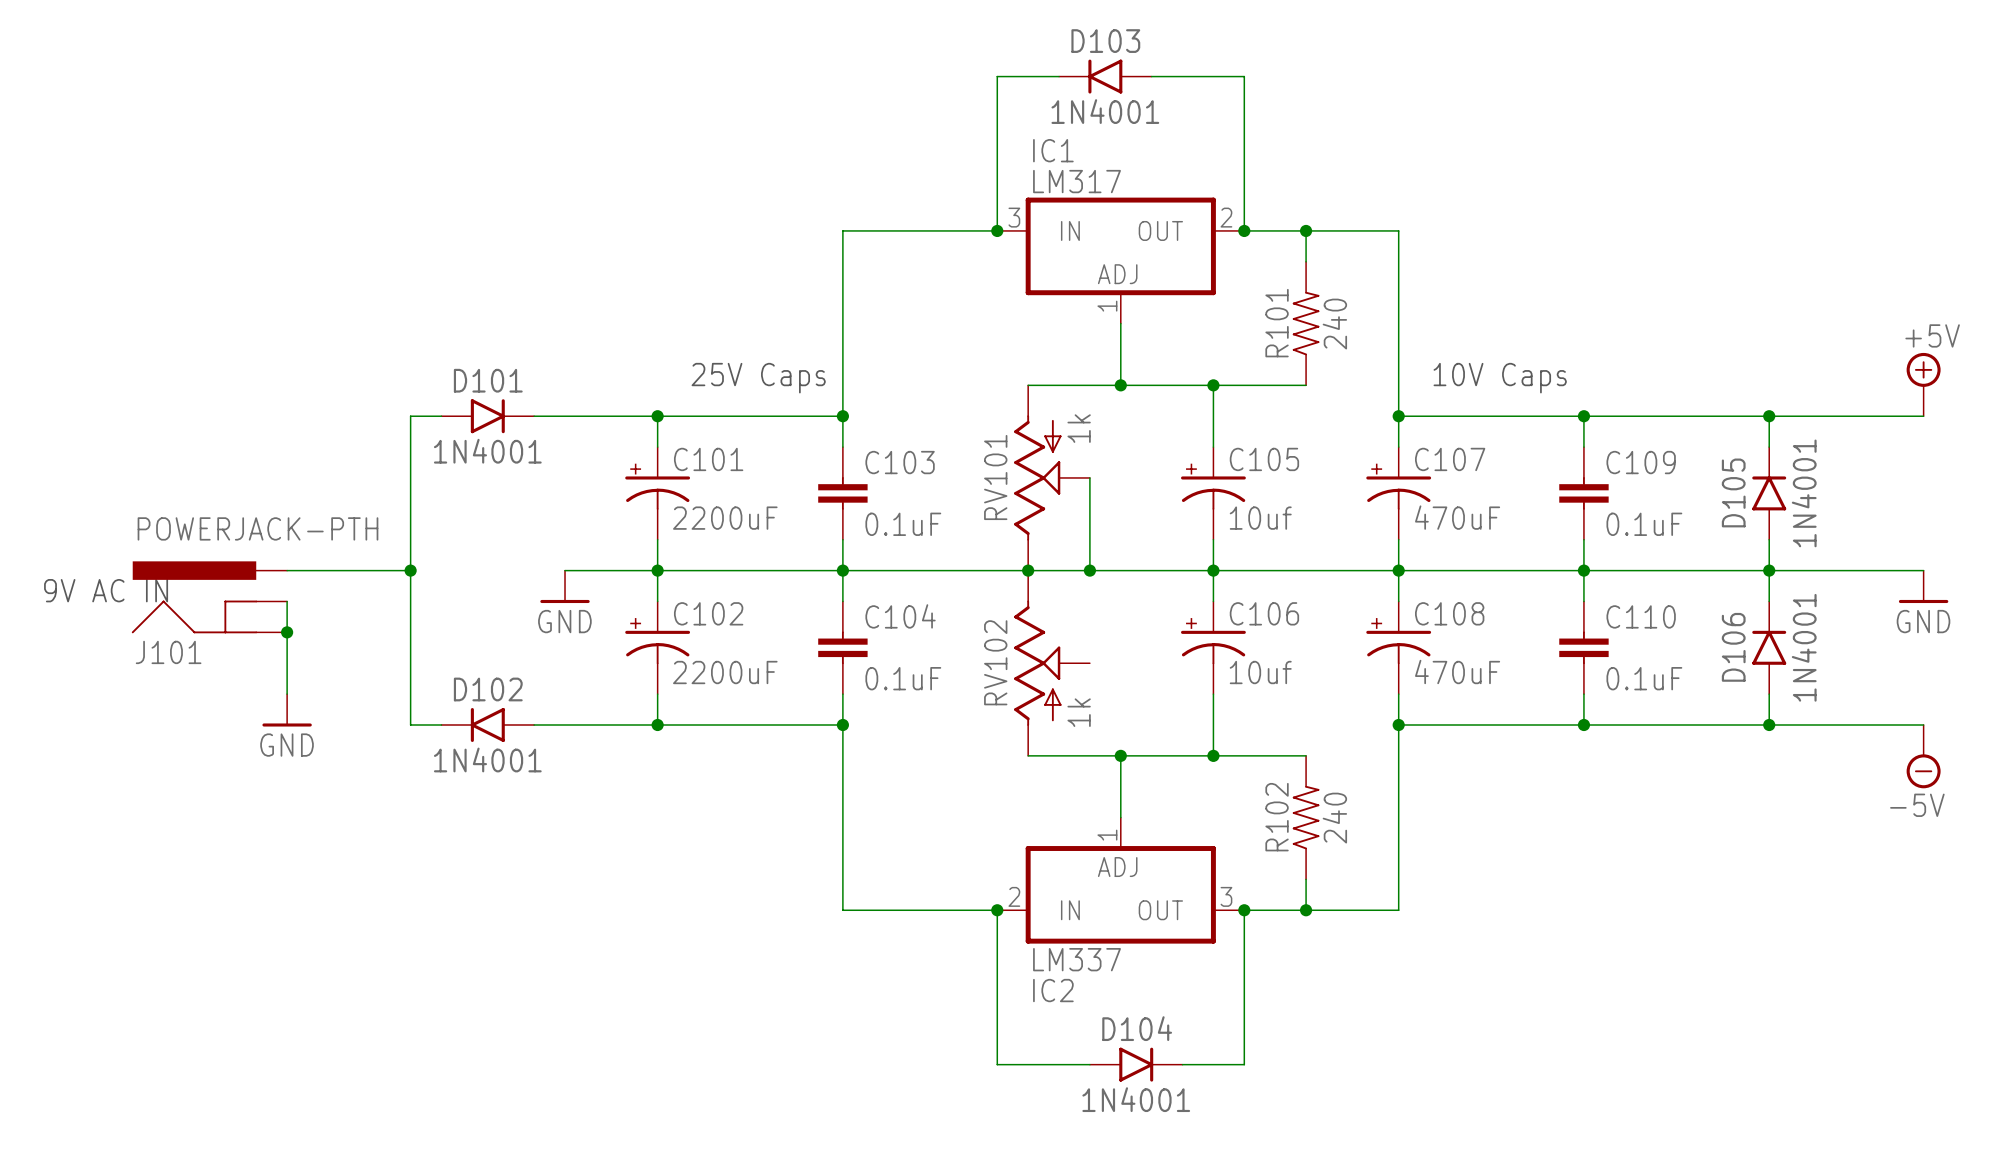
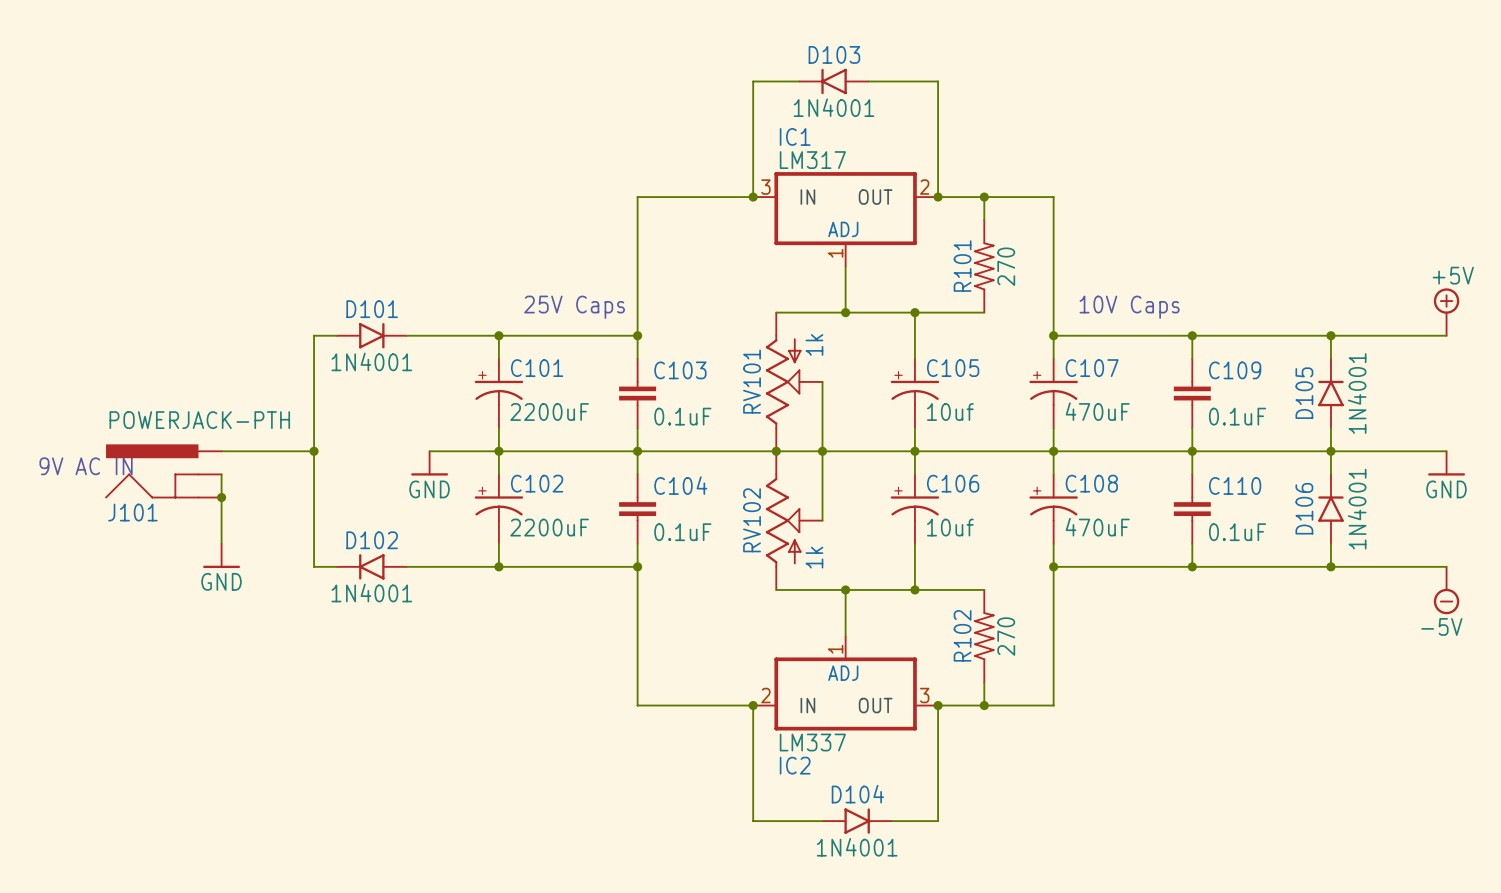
R101 value: 240 (1334, 324) -> 270 (1006, 266)
wire: none -> (822, 451) (822, 520)
R102 value: 240 (1334, 818) -> 270 (1006, 636)

